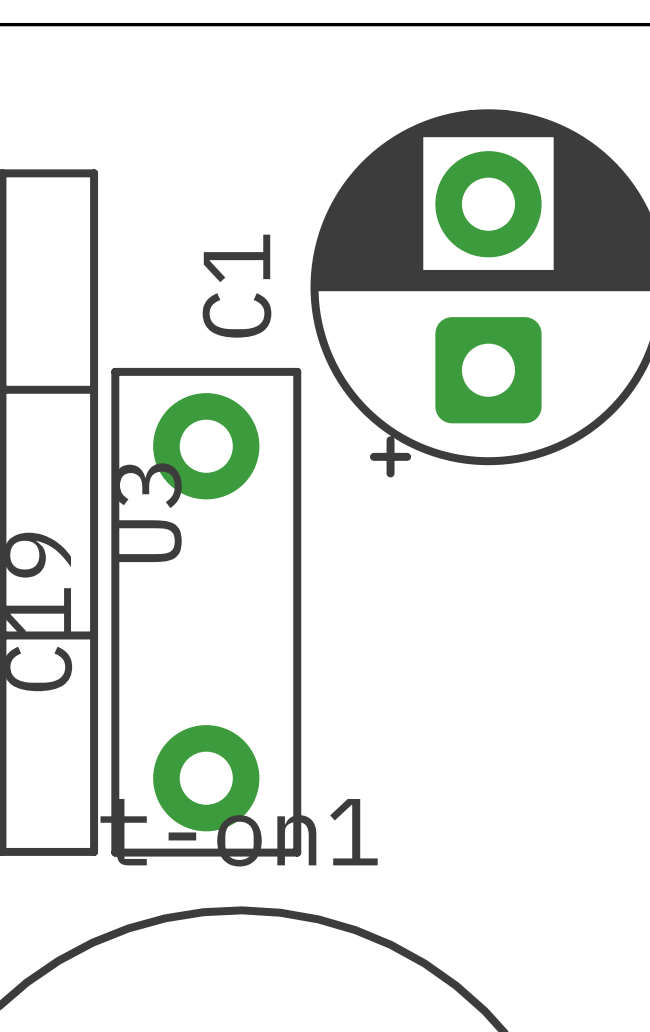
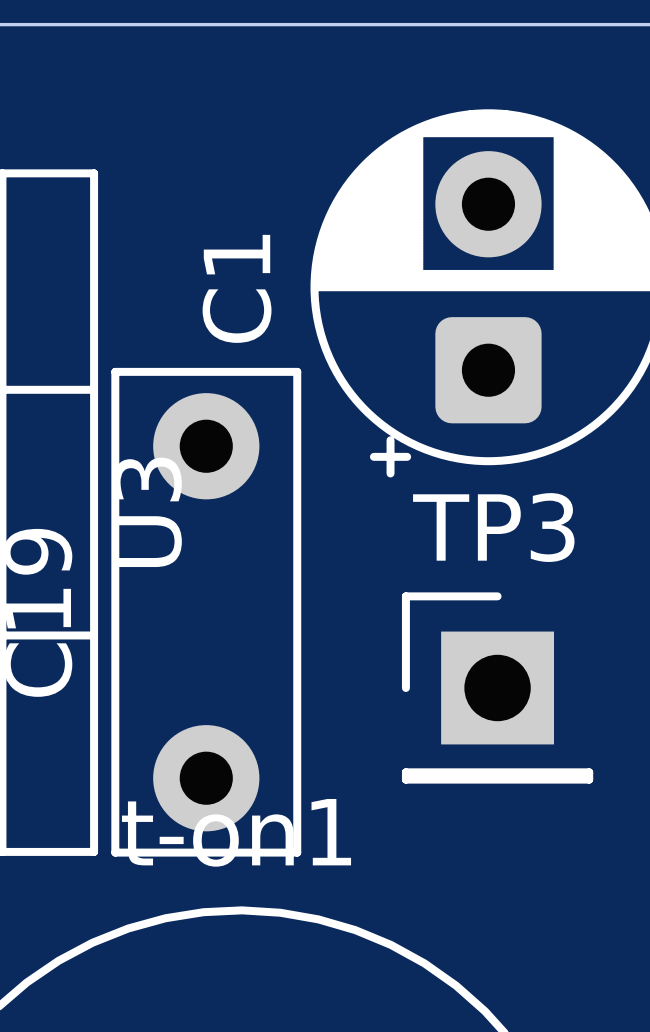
TP3: none -> (497, 687)

